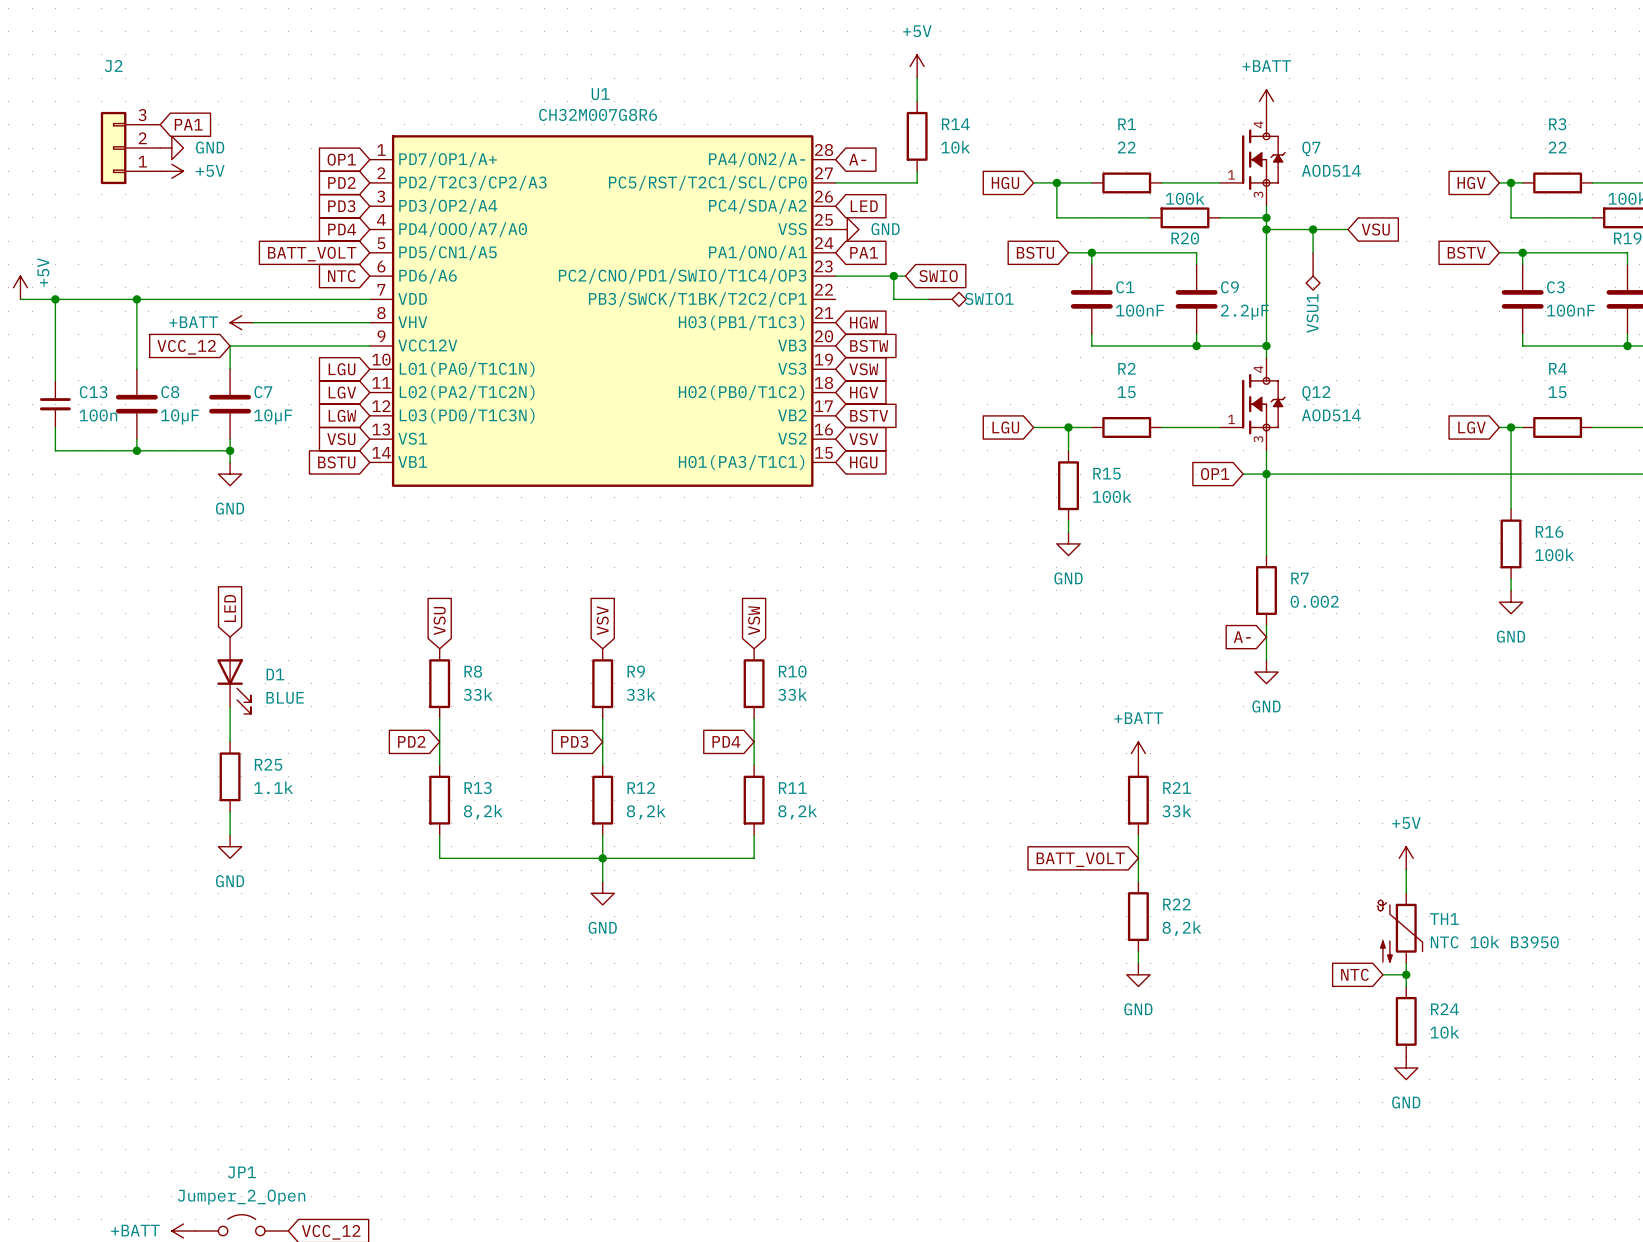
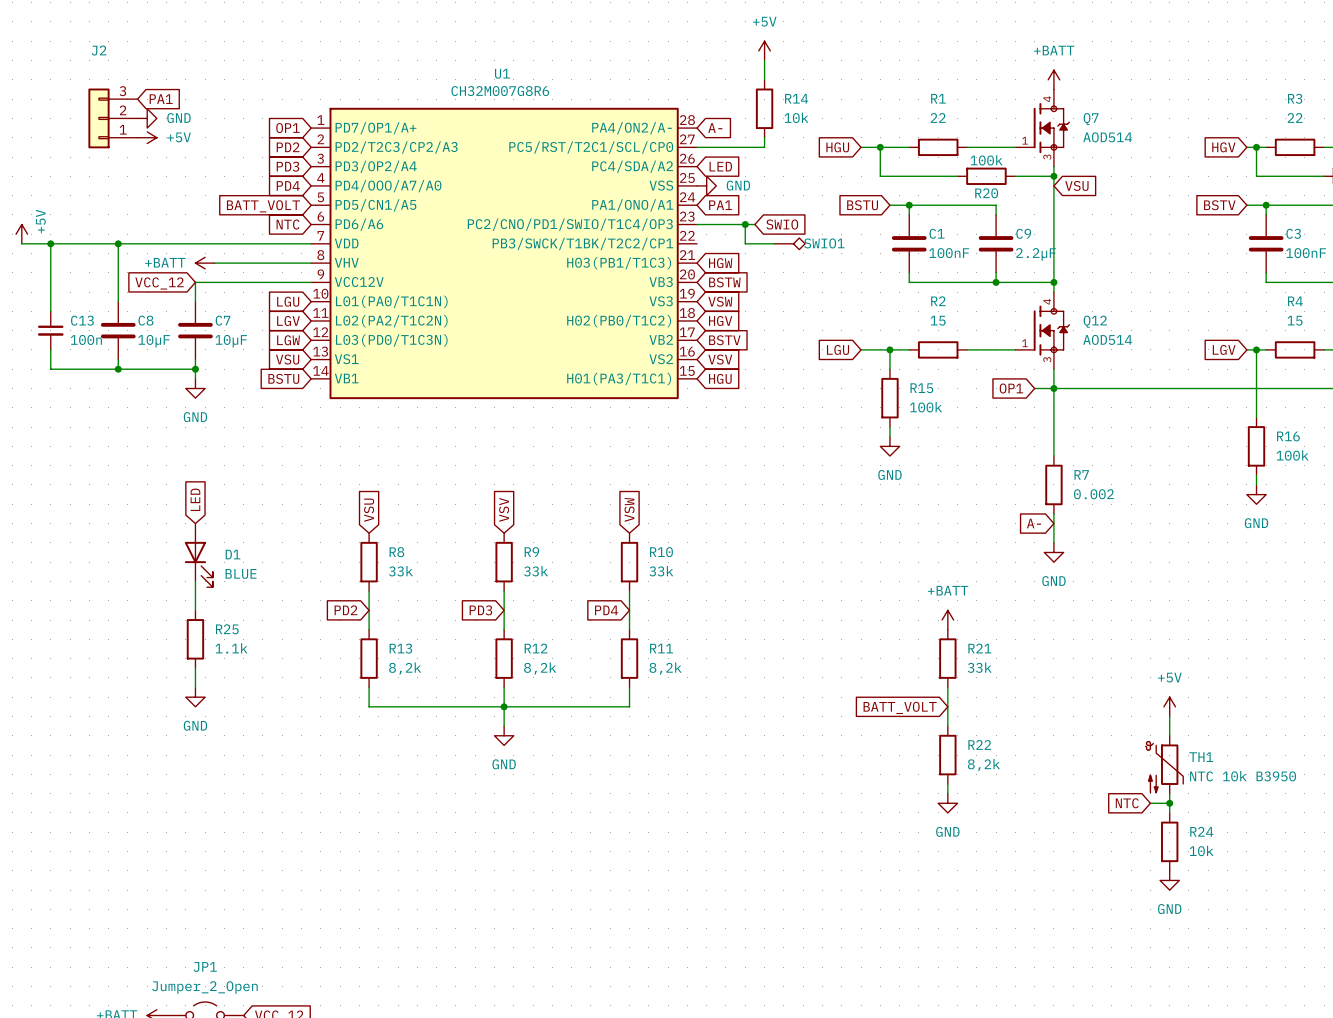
wire: (1266, 229) (1348, 229) -> none
junction: (1266, 229) -> none
wire: (1313, 229) (1313, 252) -> none
junction: (1313, 229) -> none
global label position: VSU (1375, 229) -> VSU (1076, 185)
VSU1: (1313, 271) -> none

